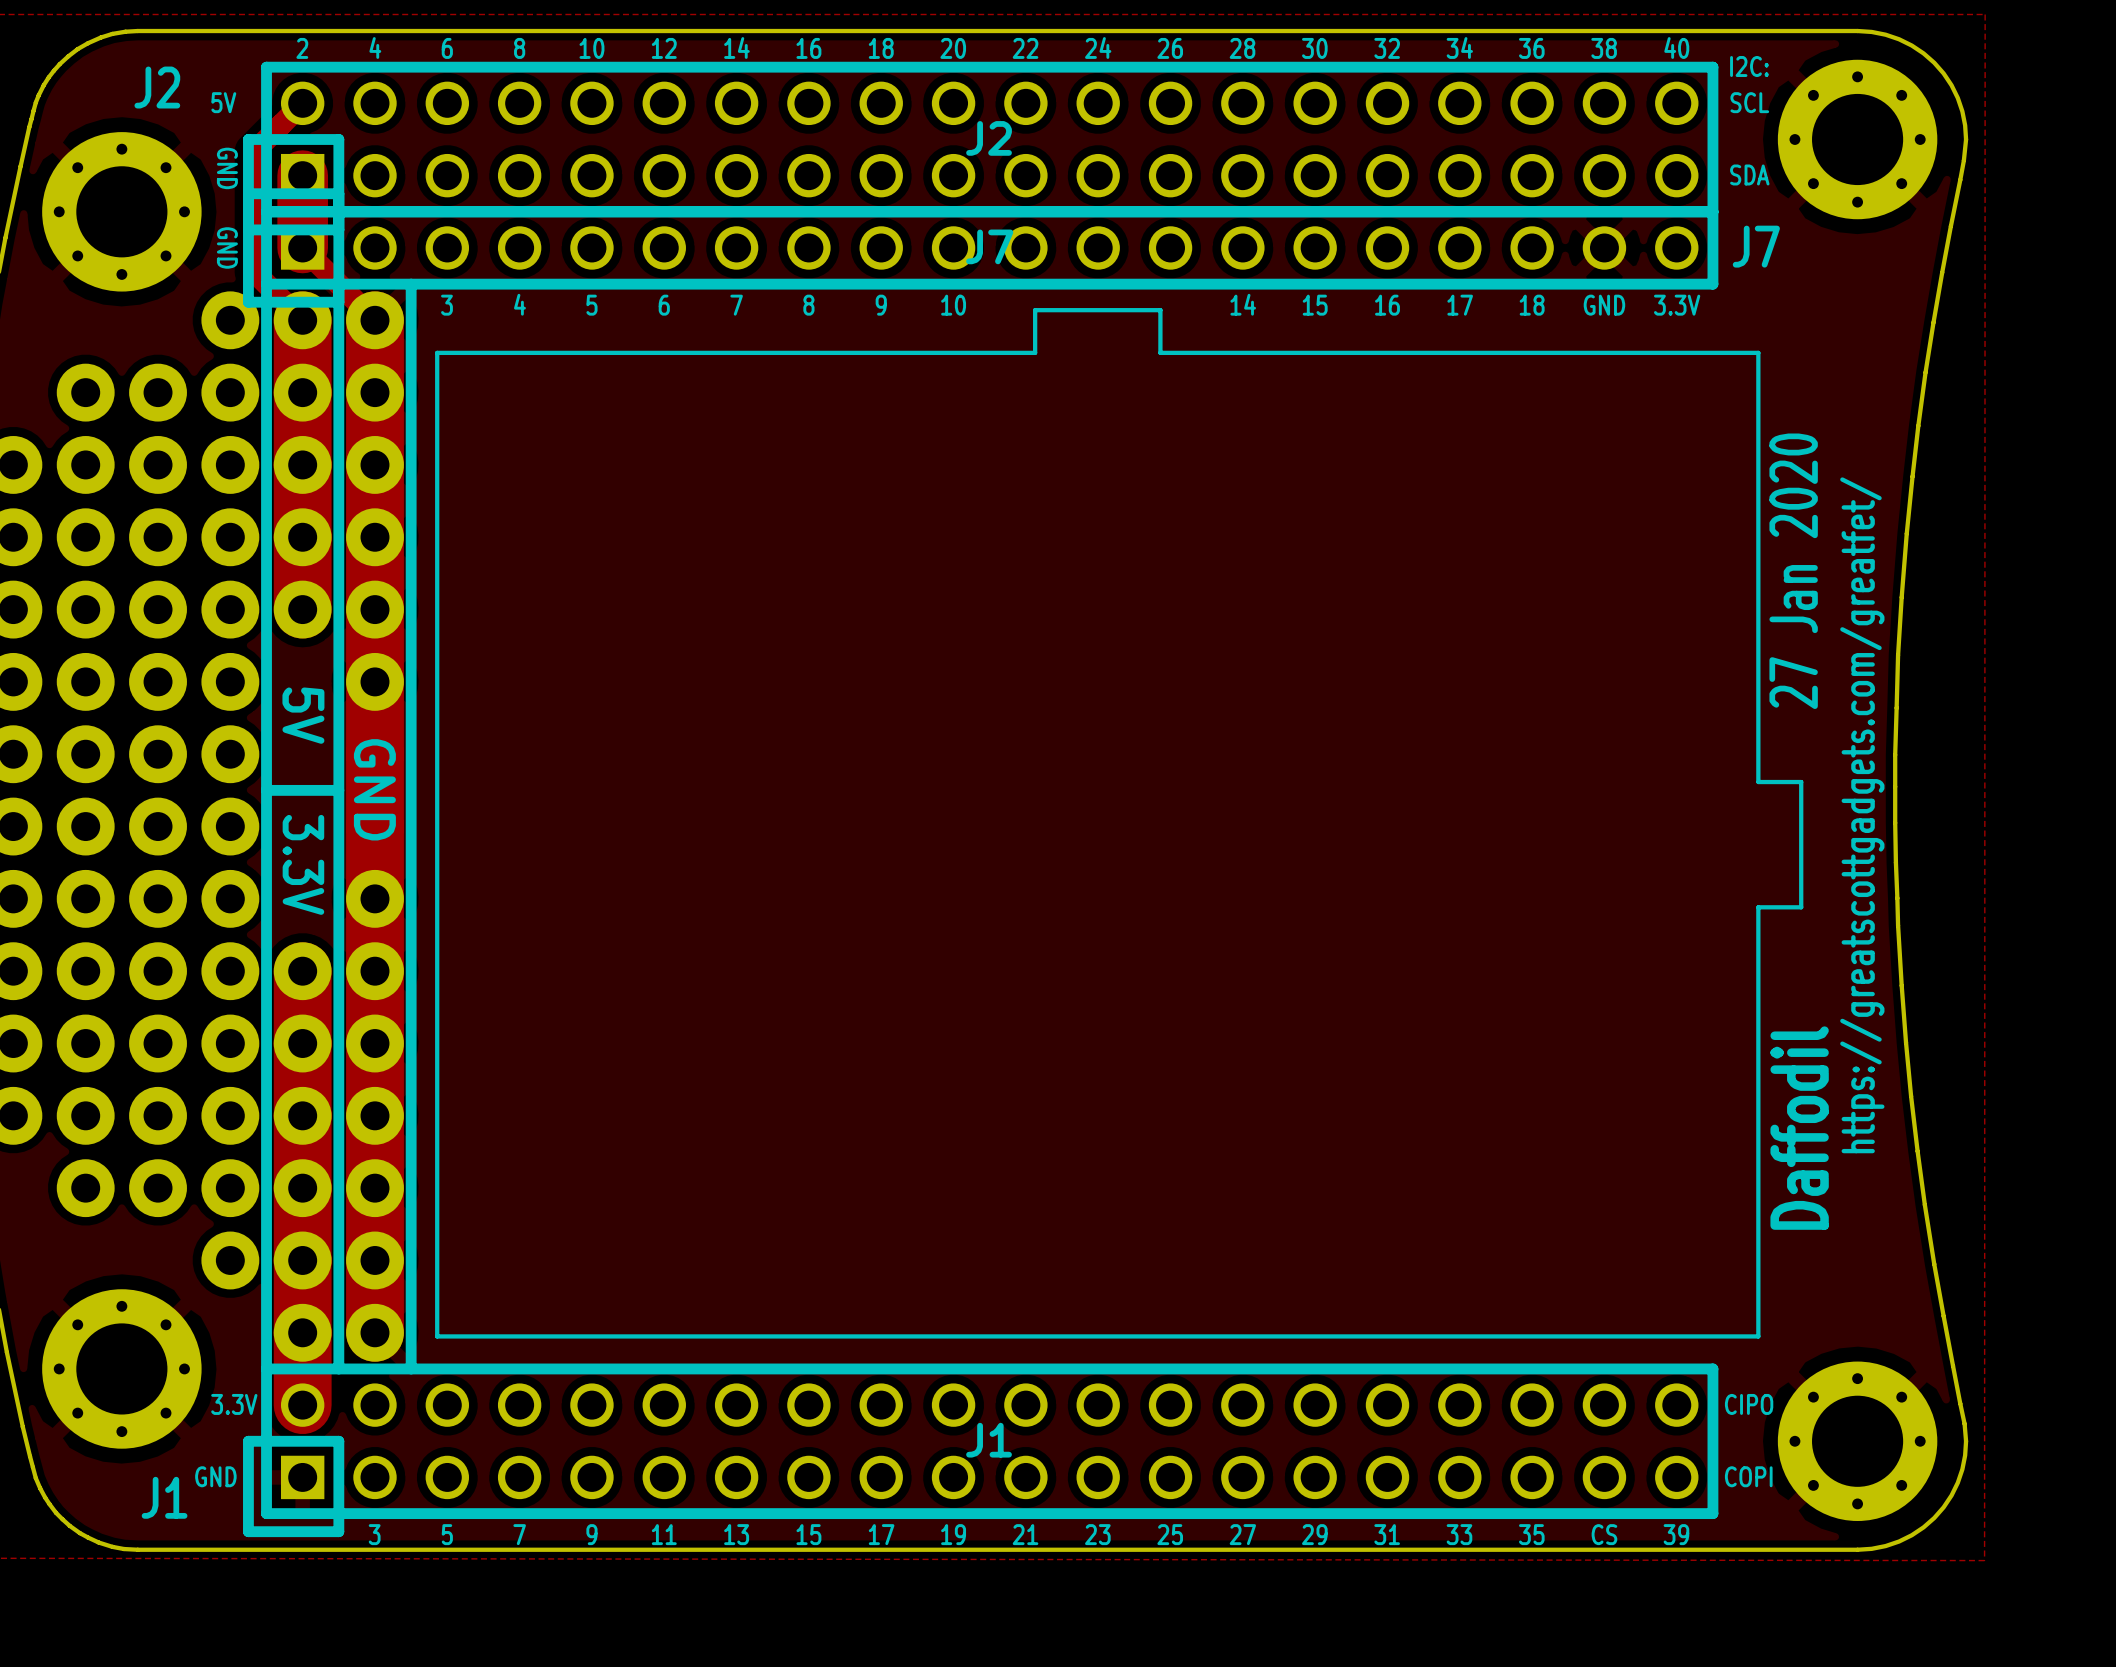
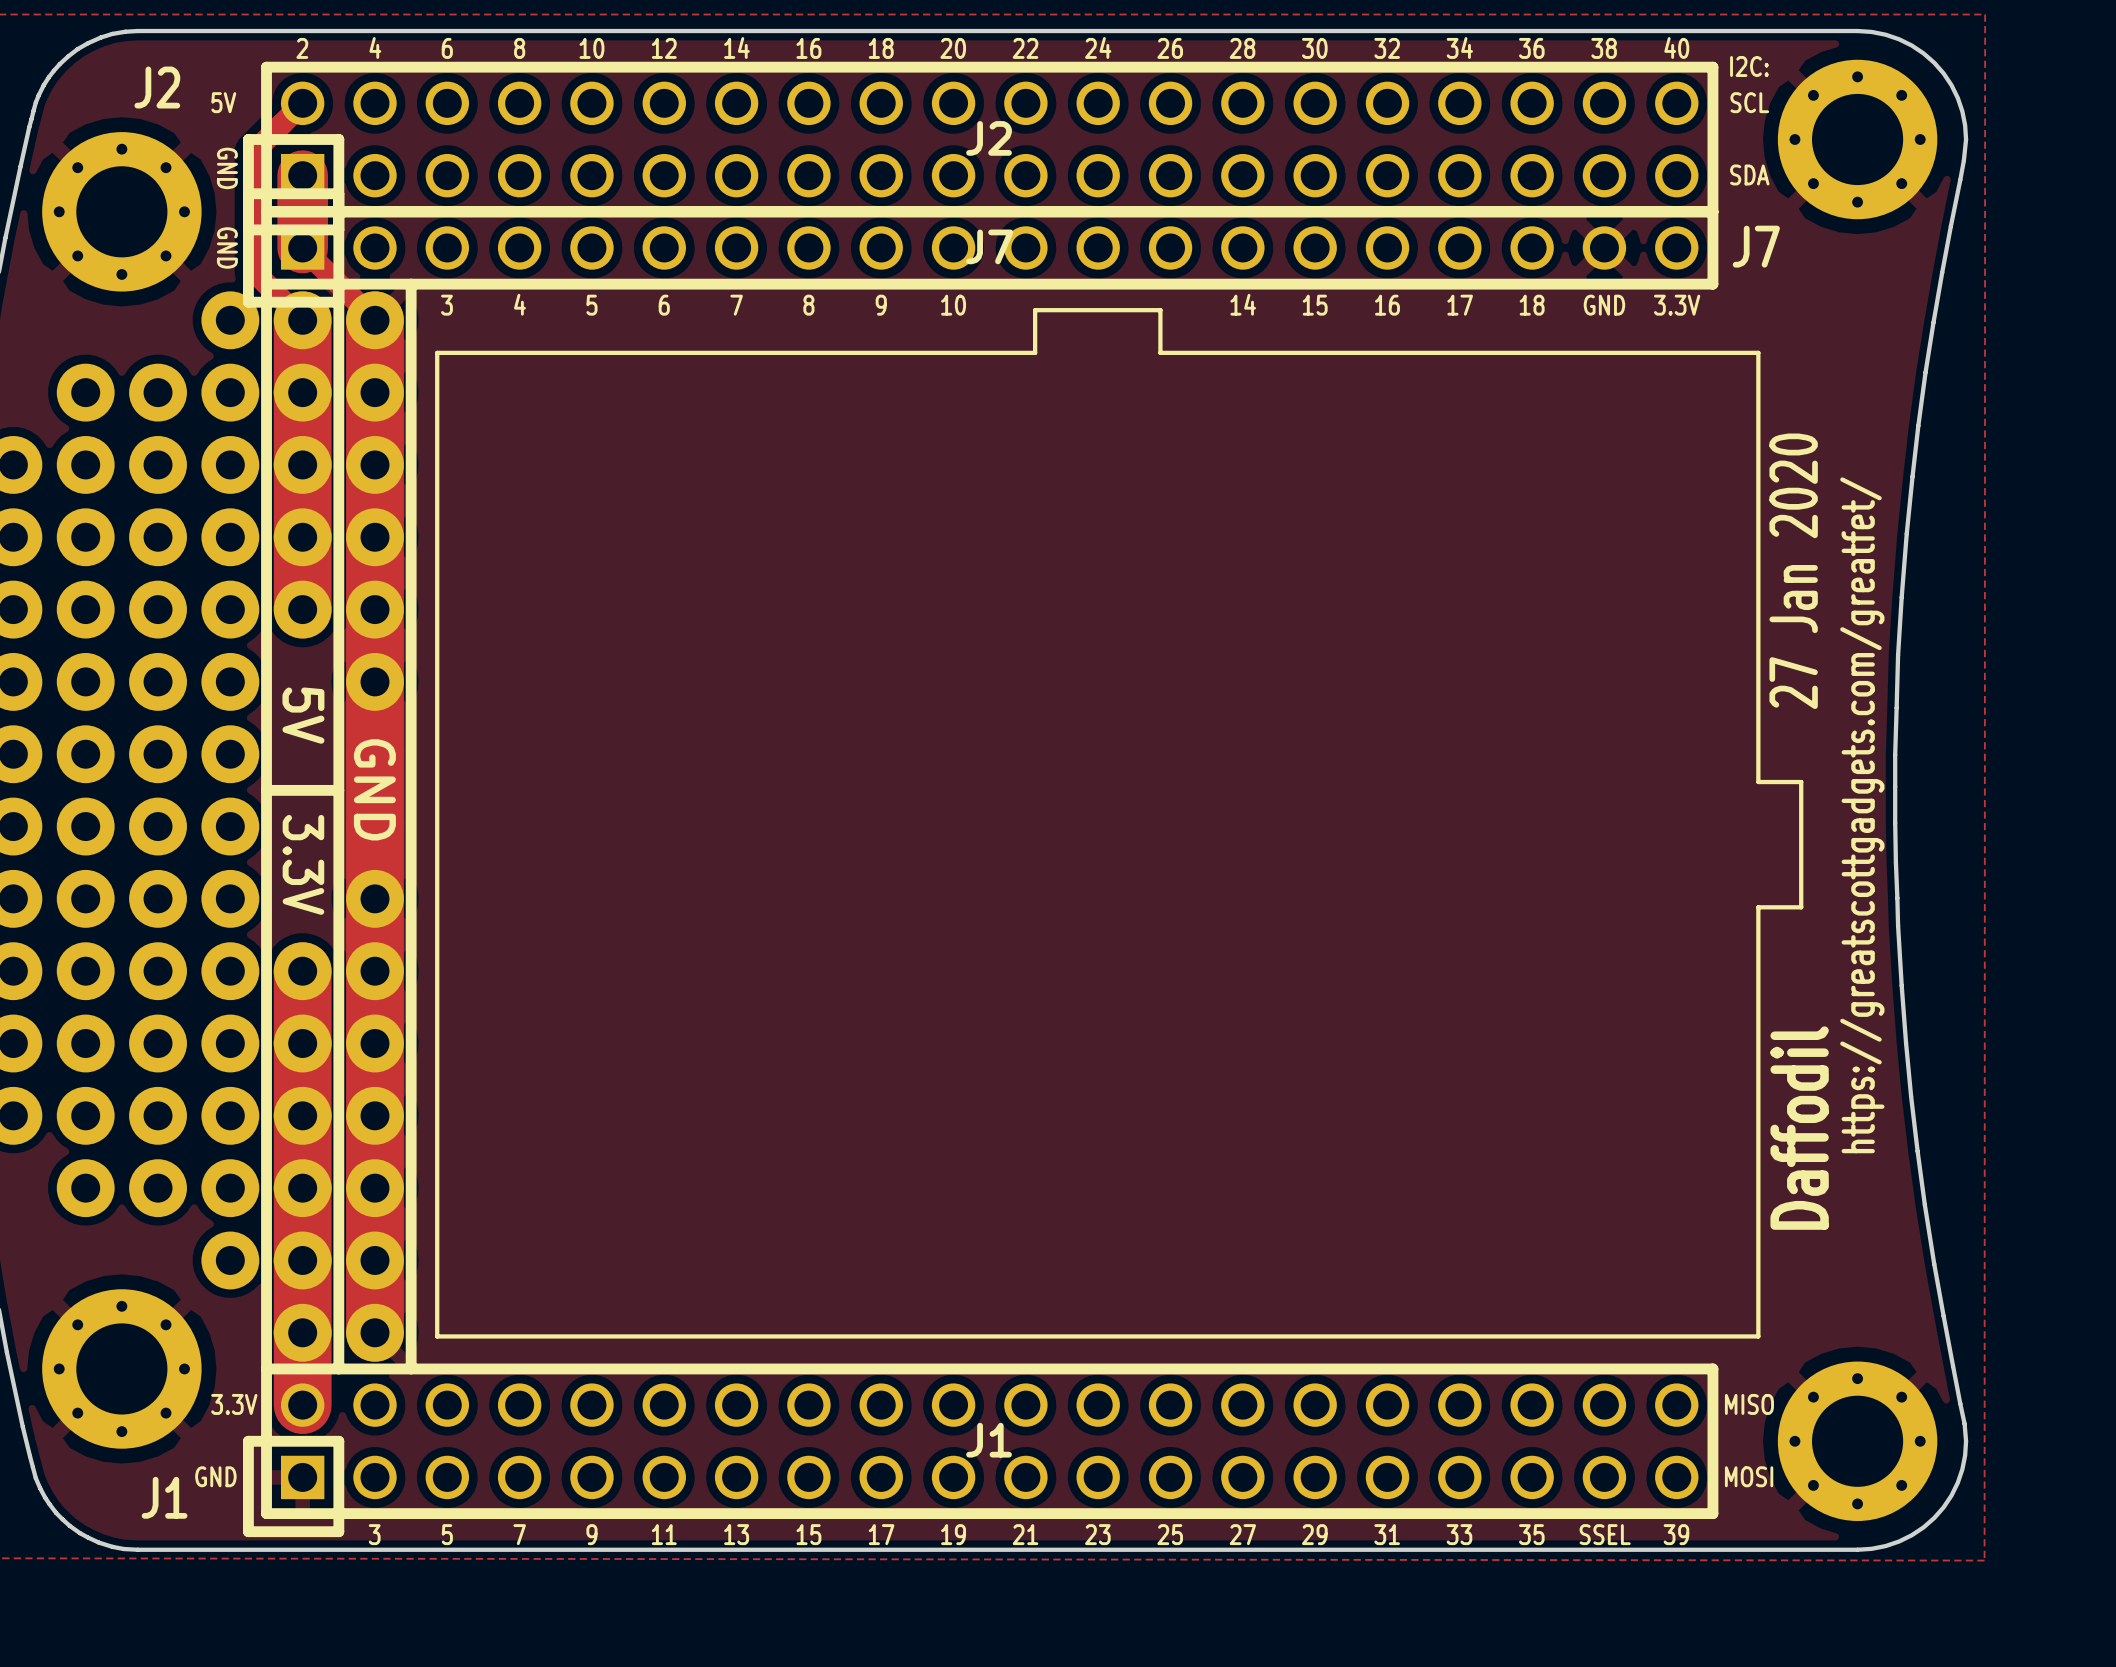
text: CIPO (1749, 1404) -> MISO (1749, 1404)
text: COPI (1748, 1476) -> MOSI (1749, 1476)
text: CS (1604, 1534) -> SSEL (1605, 1534)

